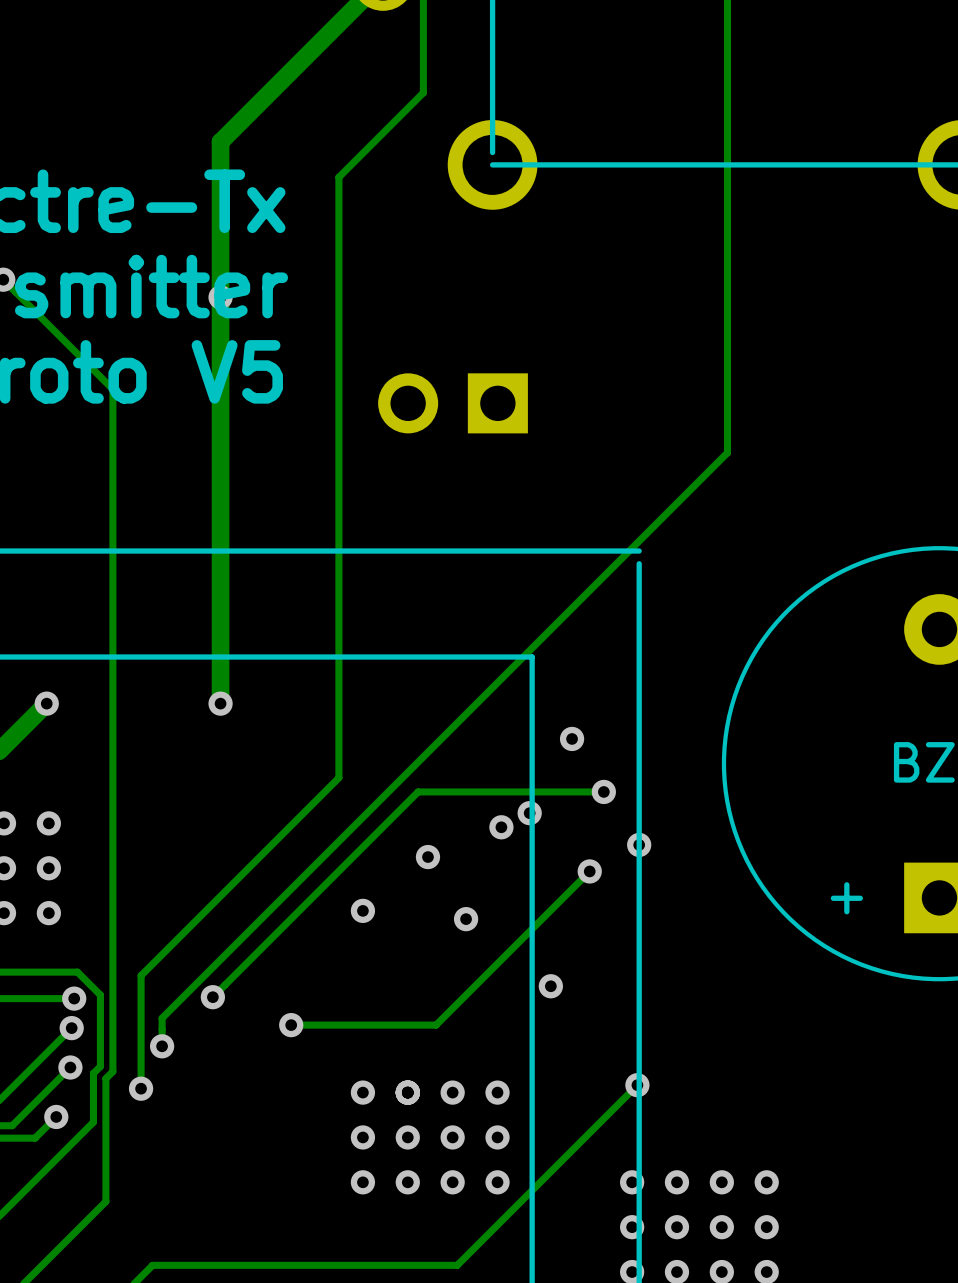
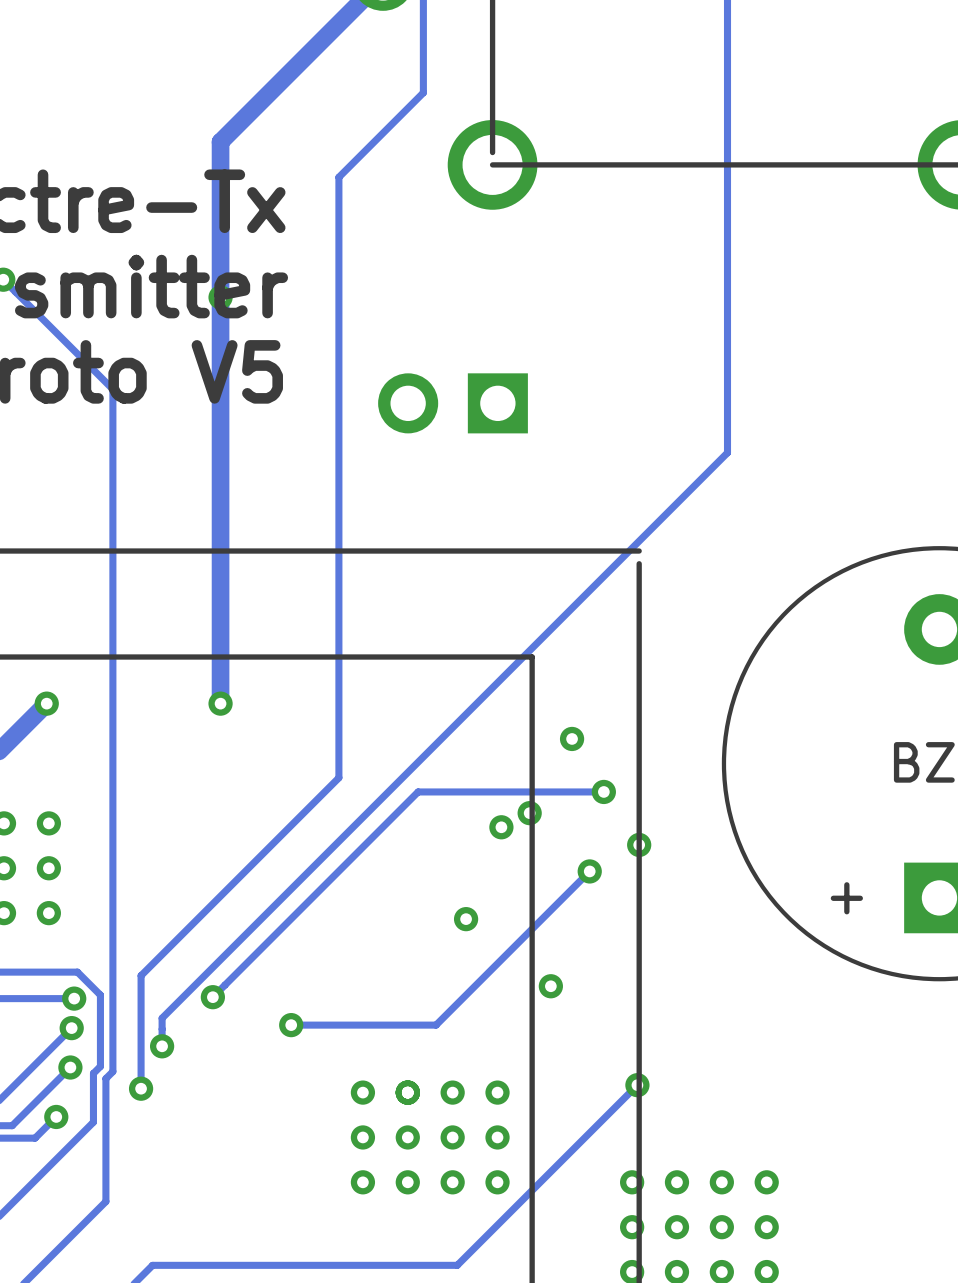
via: (427, 857) -> none
via: (362, 910) -> none

